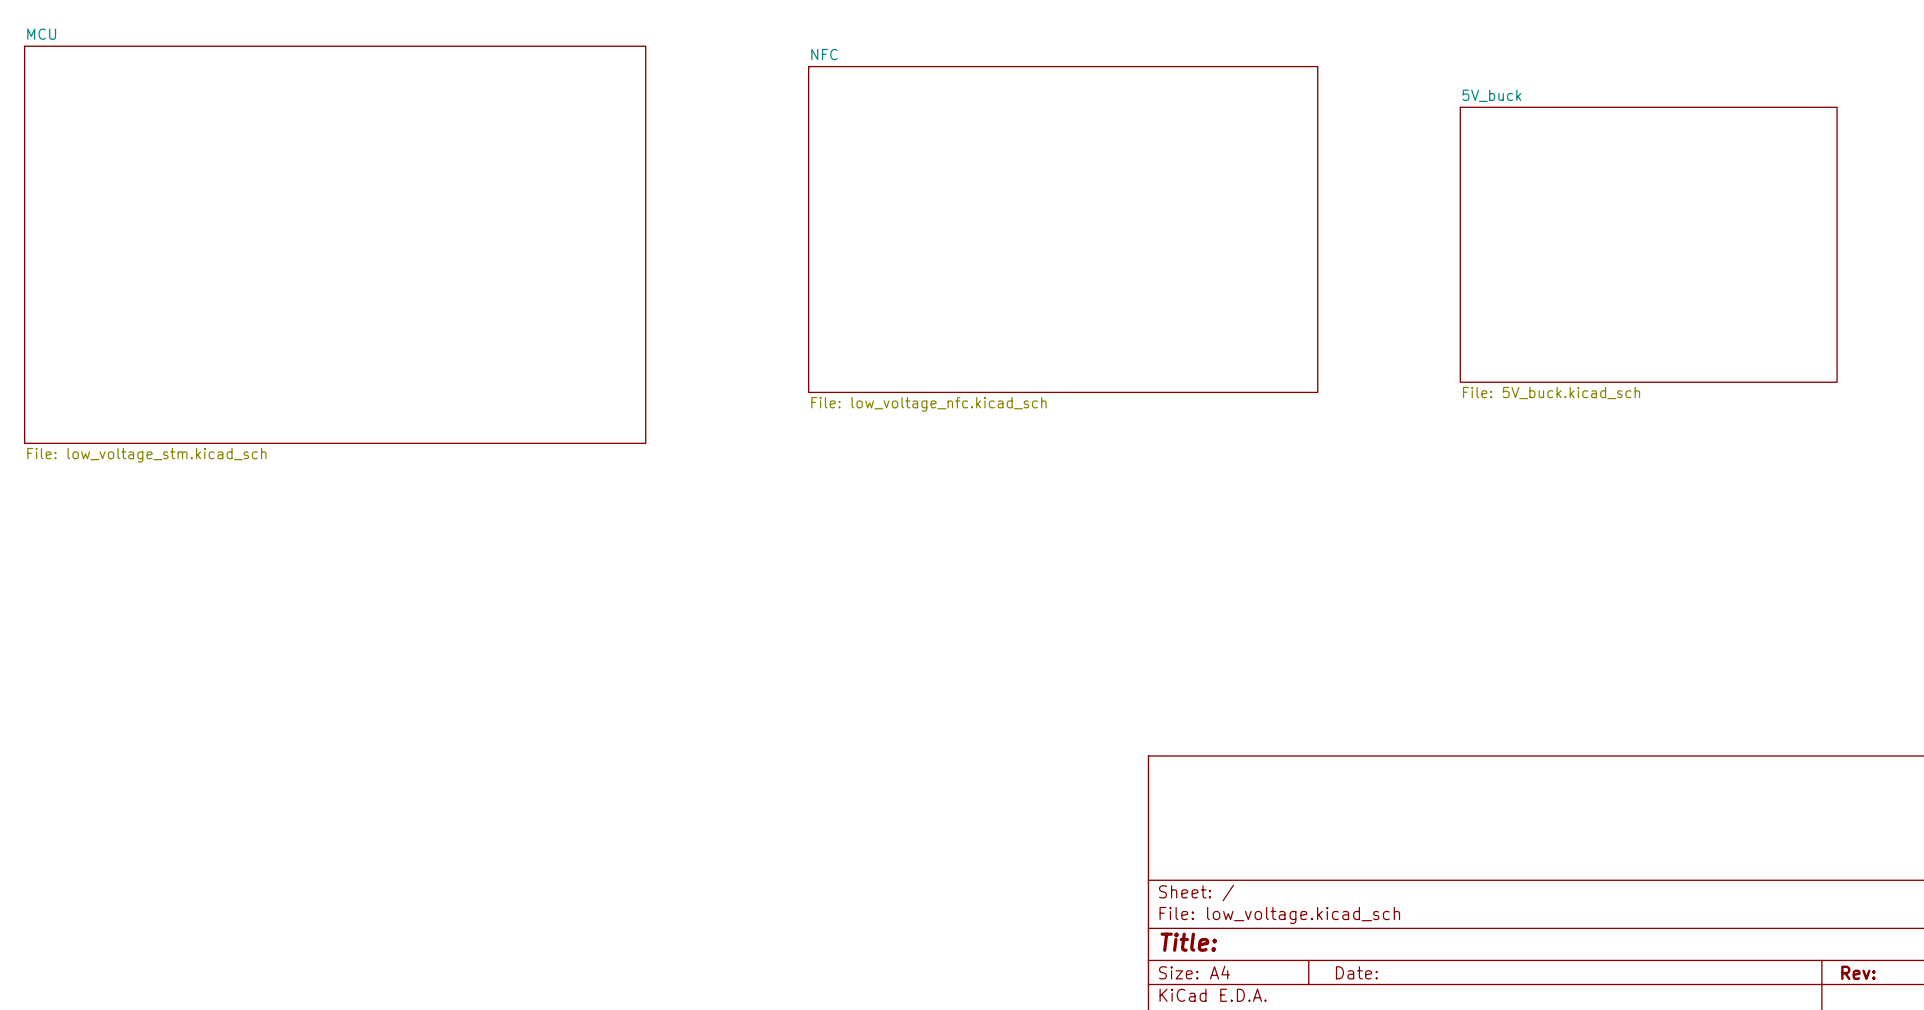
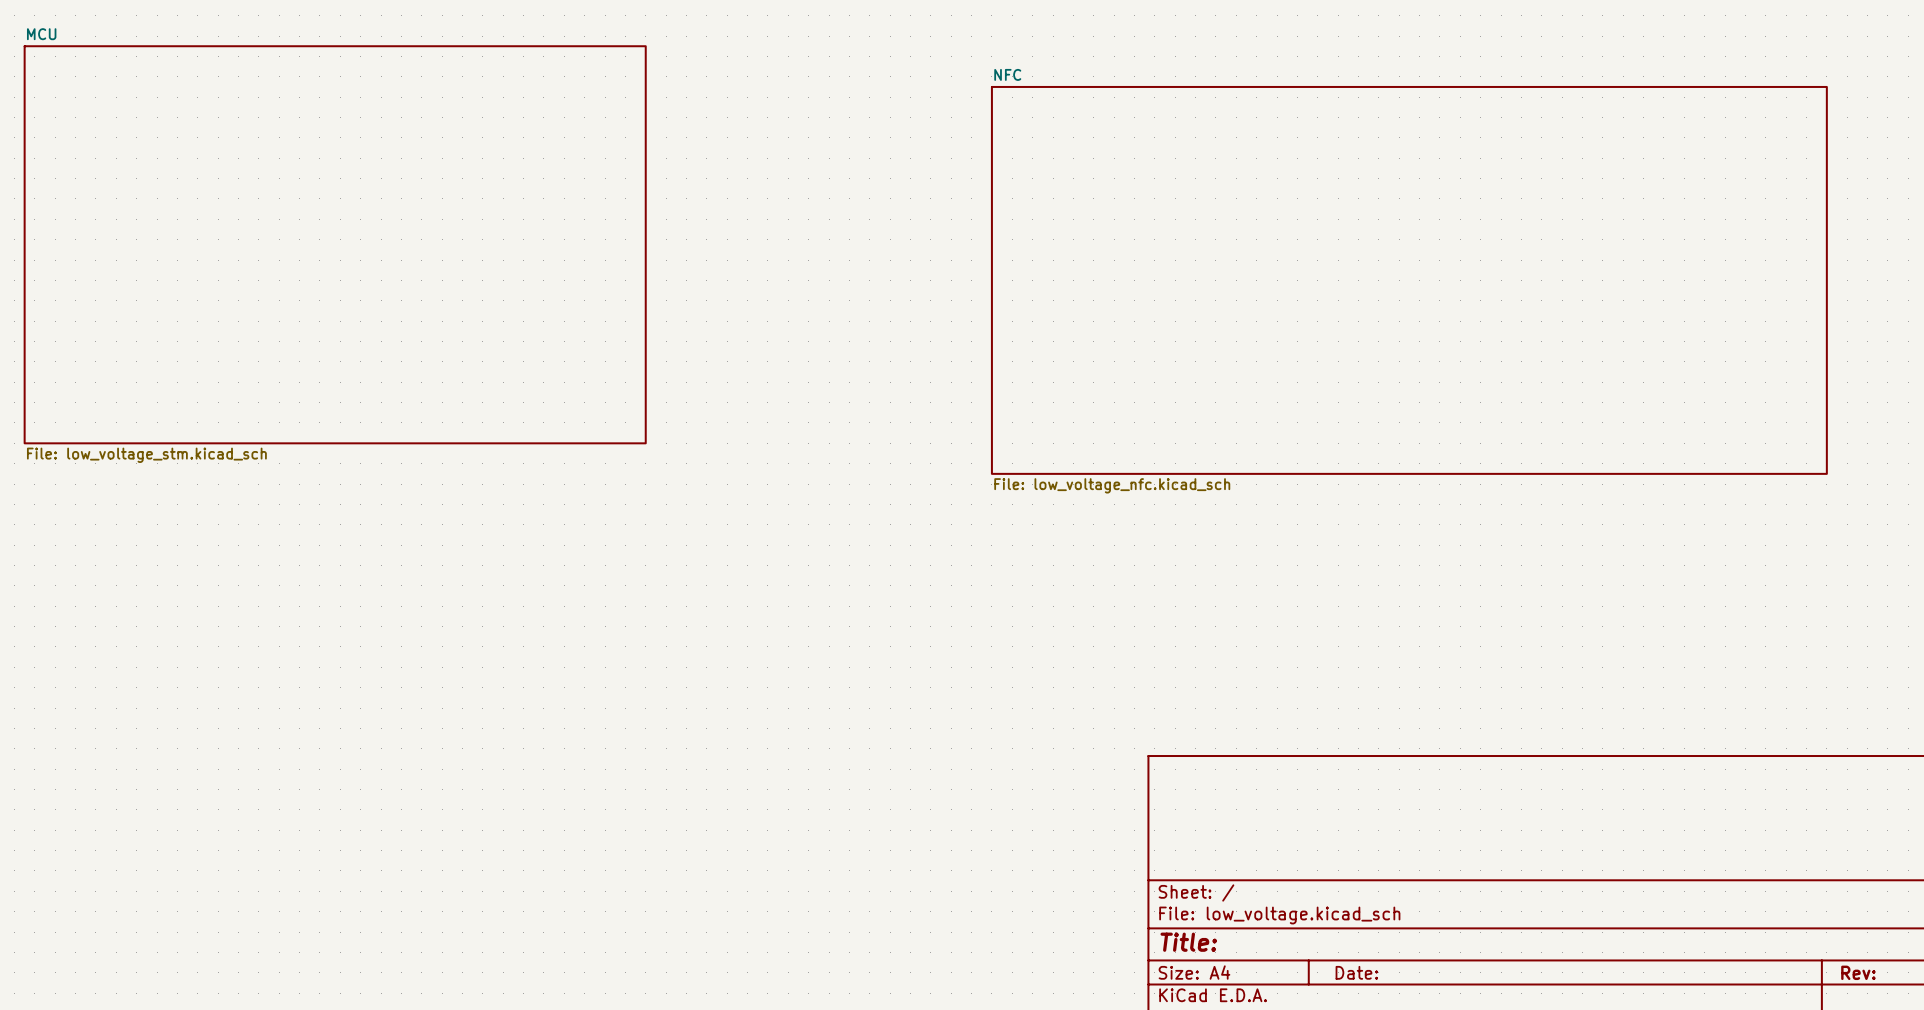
sheet NFC: File: low_voltage_nfc.kicad_sch (1063, 229) -> none
sheet 5V_buck: File: 5V_buck.kicad_sch (1648, 244) -> none
sheet NFC: none -> File: low_voltage_nfc.kicad_sch (1409, 280)

